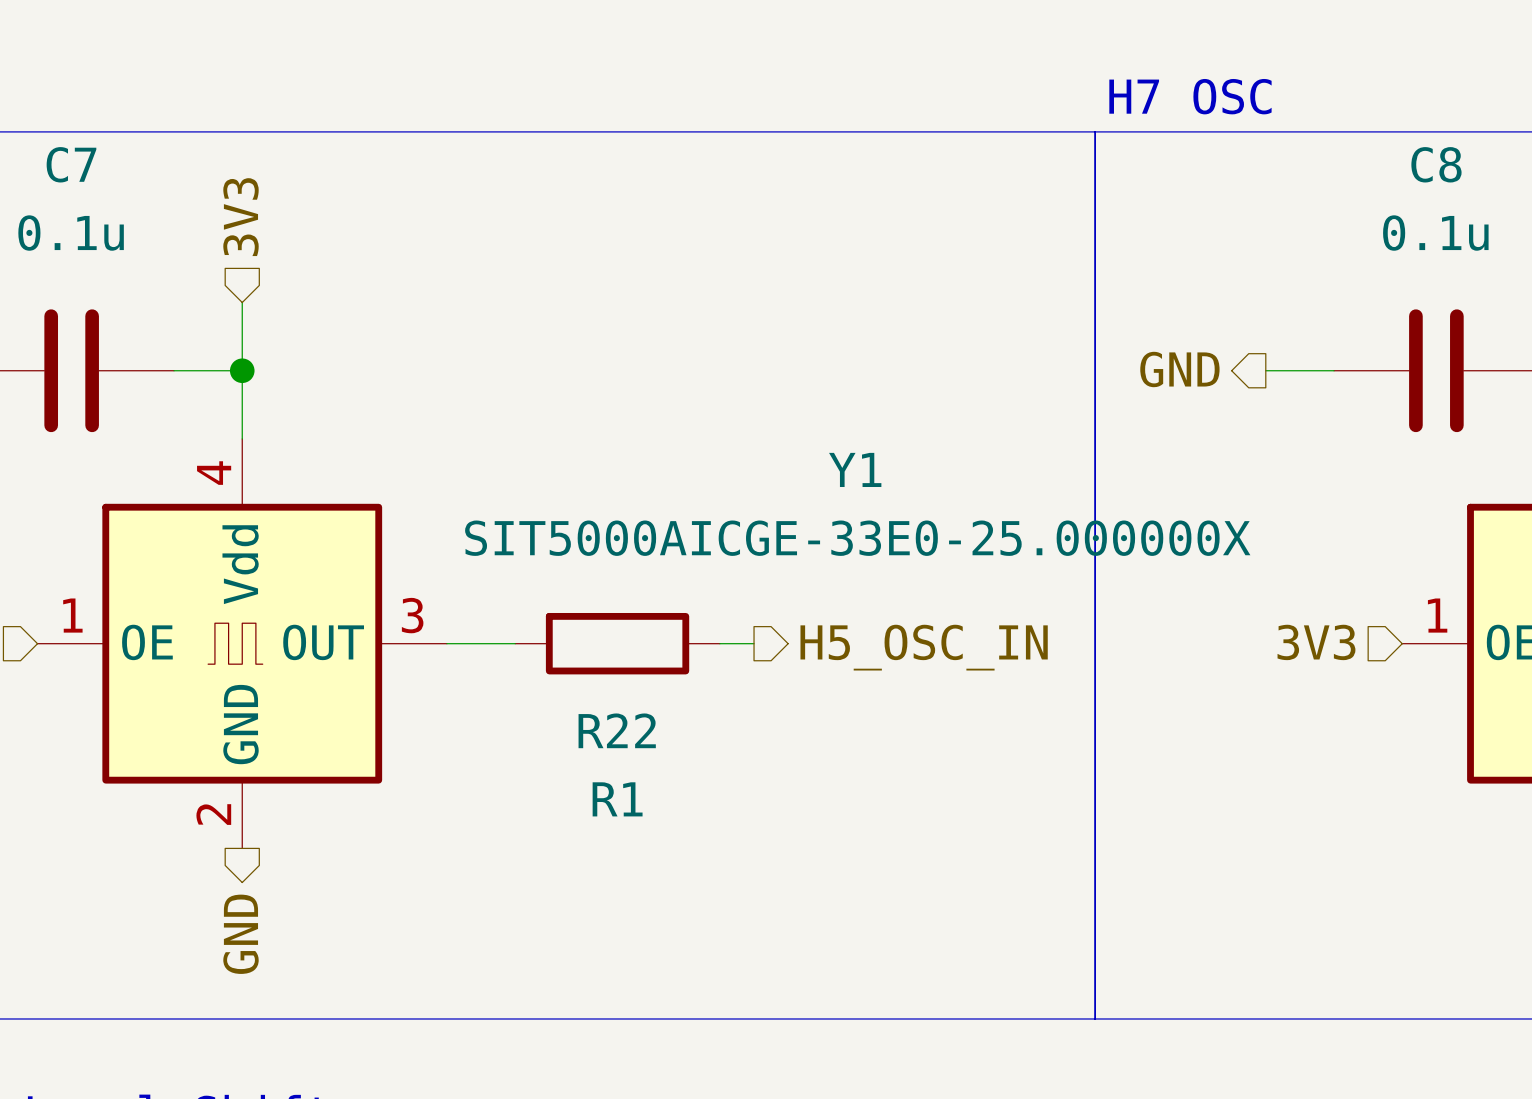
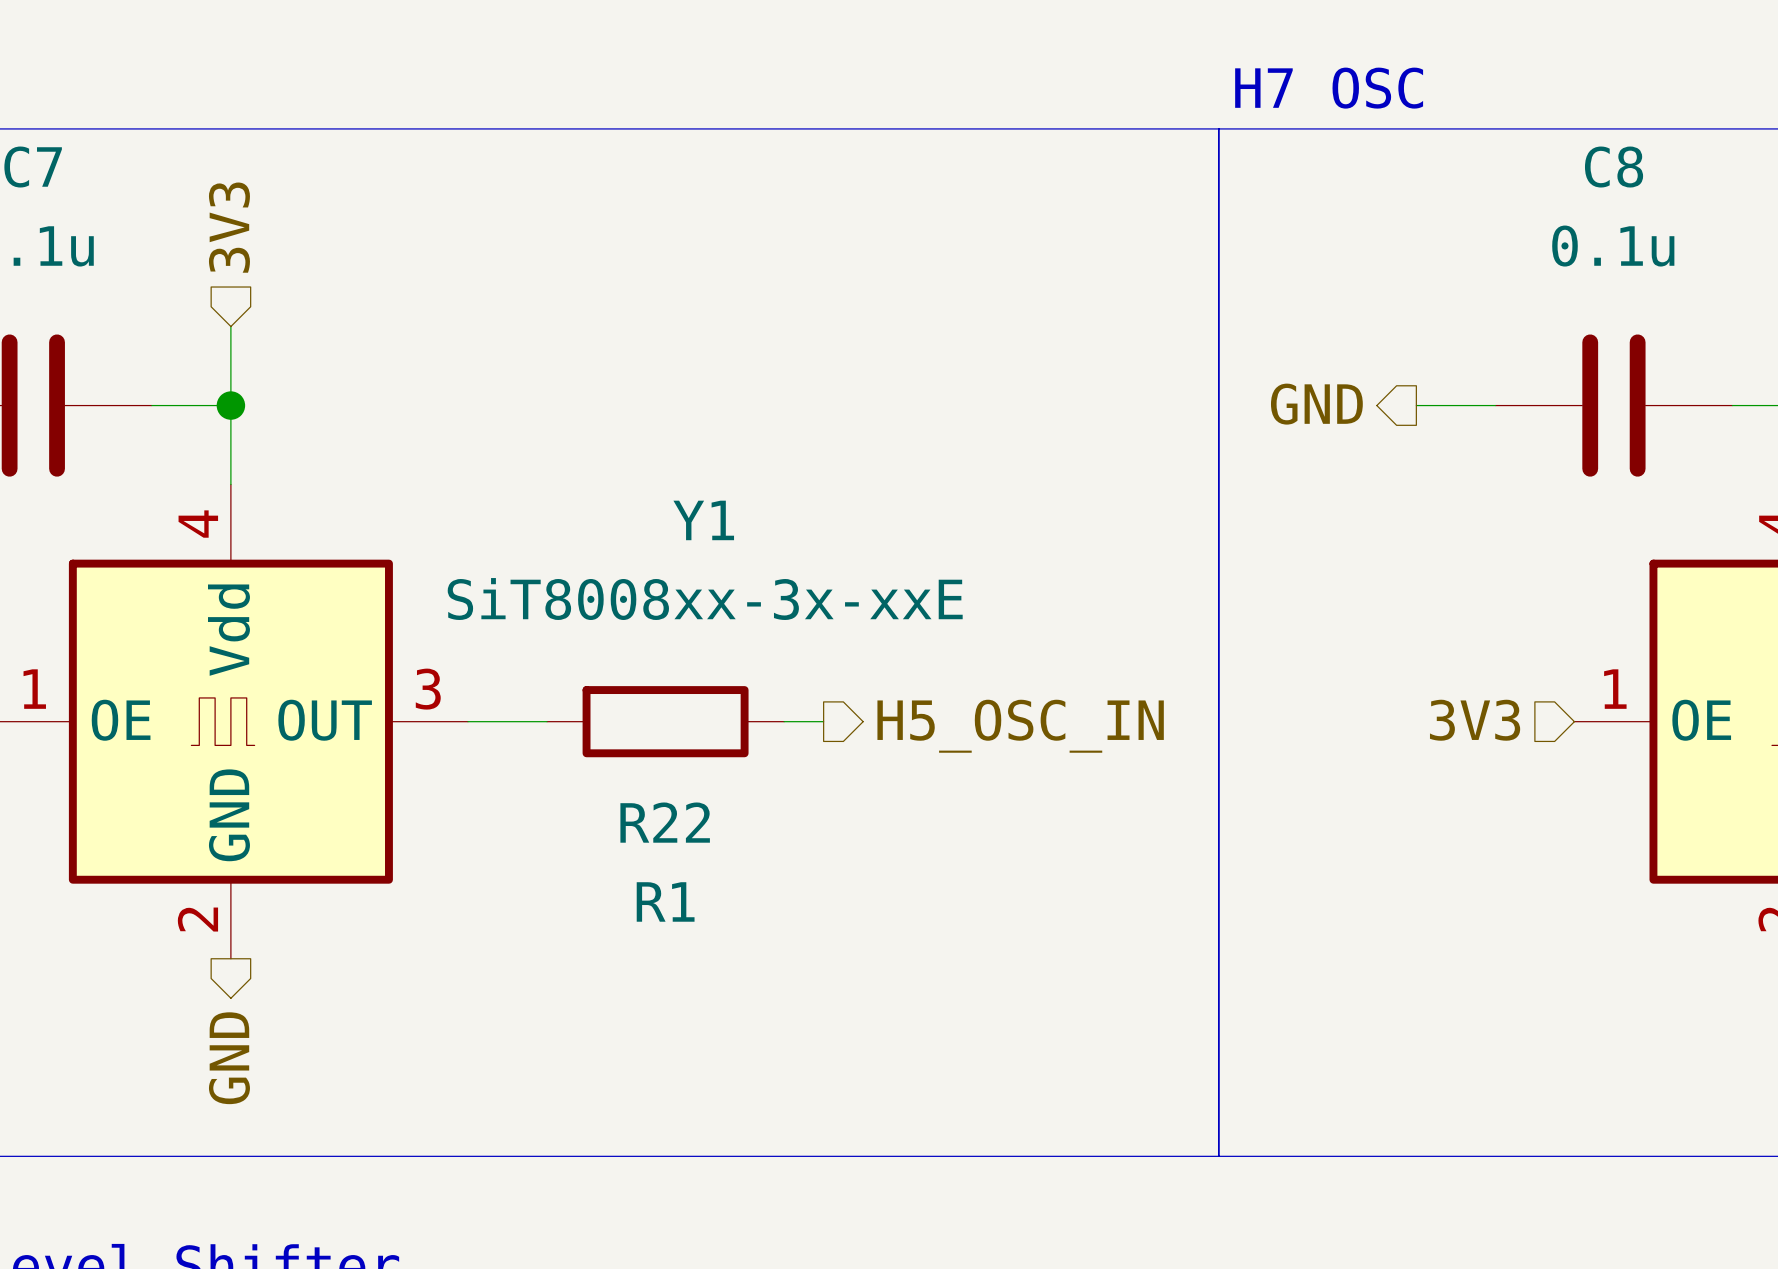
Y1 name position: Y1 (855, 469) -> Y1 (703, 520)
Y1 value: SIT5000AICGE-33E0-25.000000X (857, 538) -> SiT8008xx-3x-xxE (705, 599)

